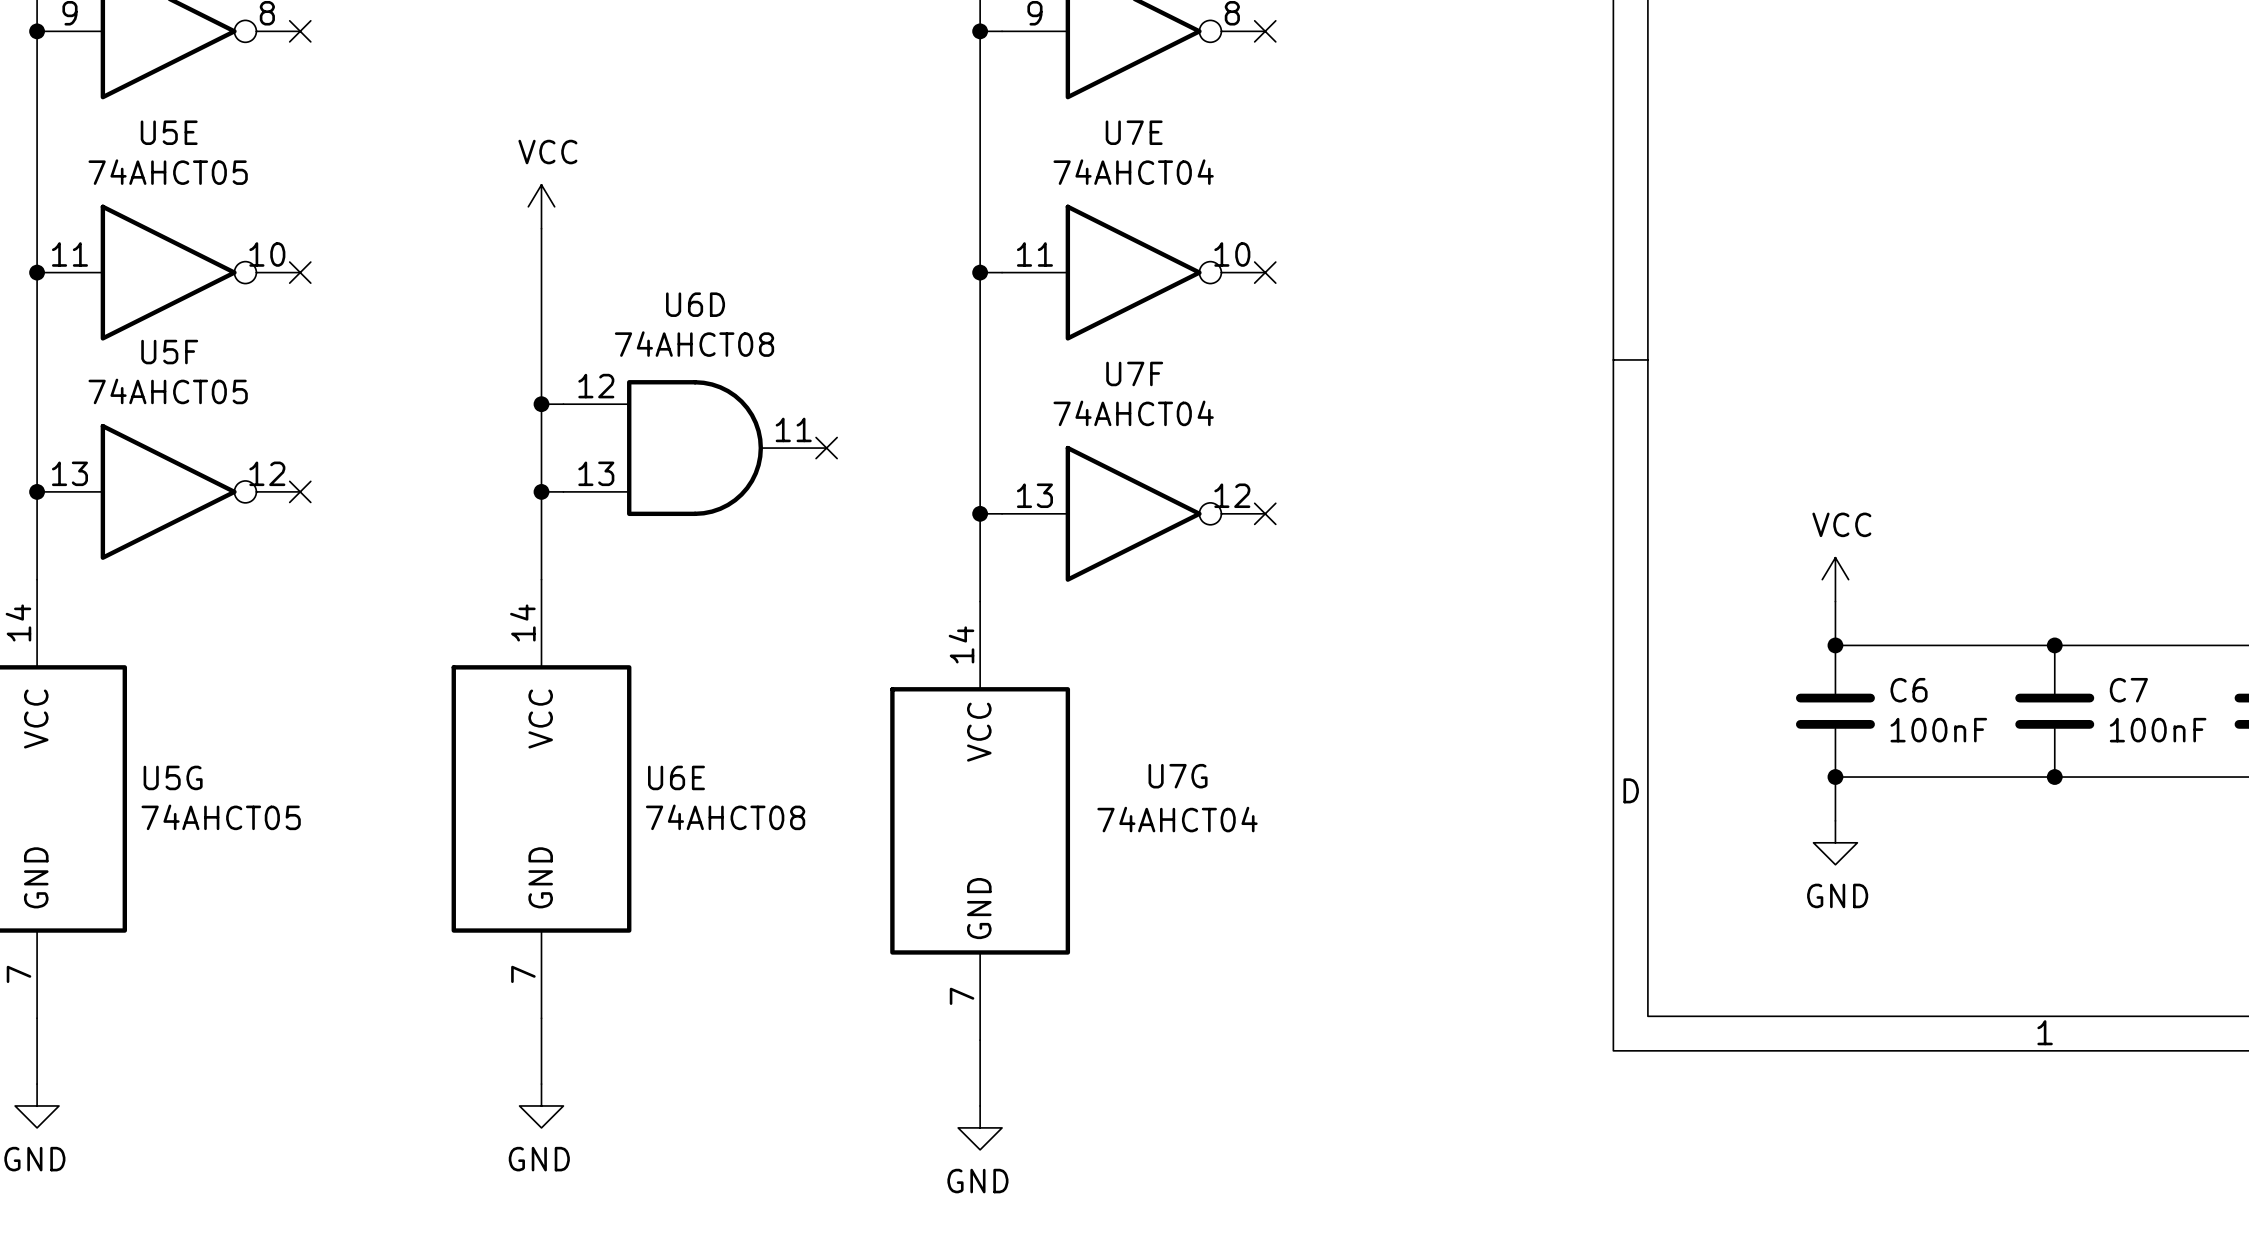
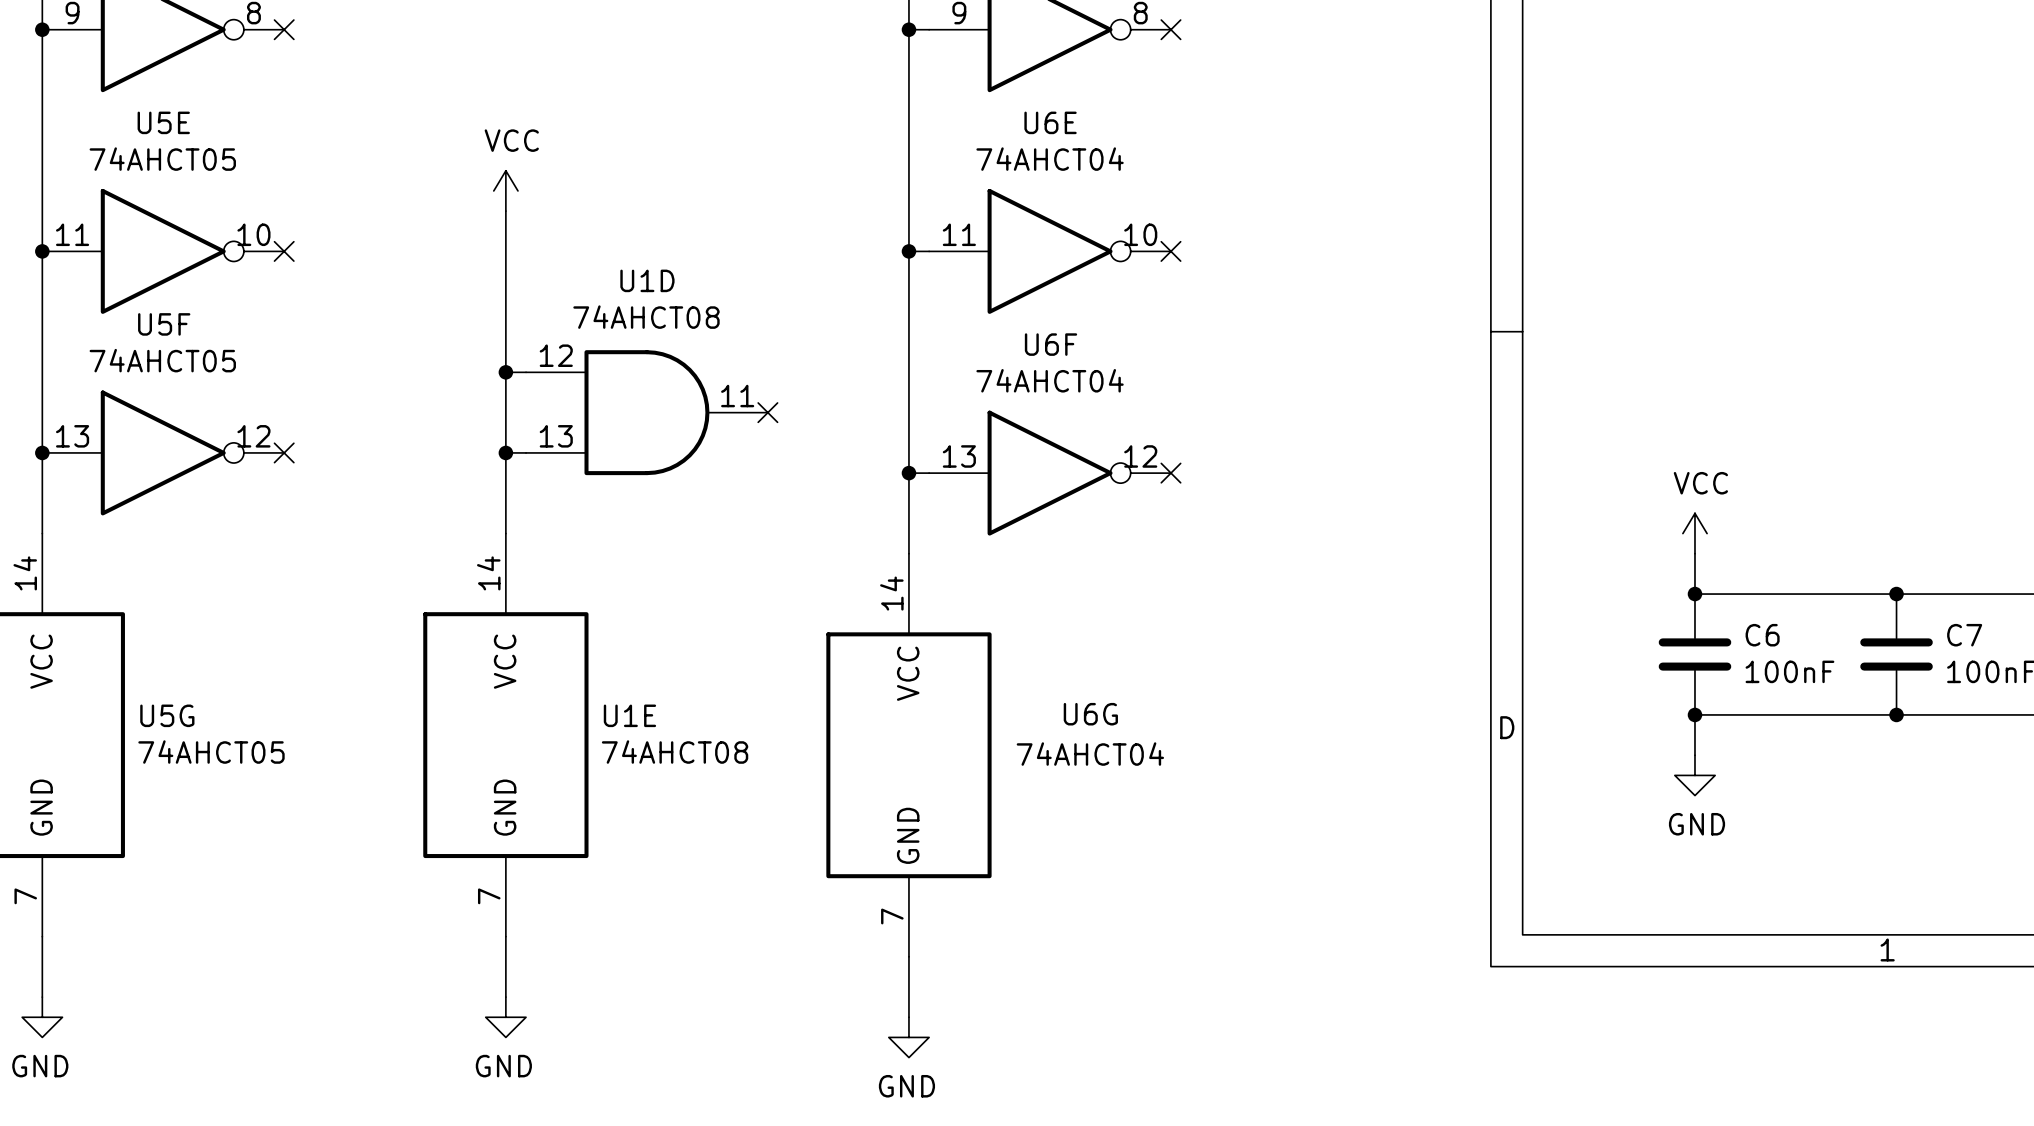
U7E name: U7E (1134, 132) -> U6E (1050, 122)
U6D name: U6D (695, 304) -> U1D (647, 280)
U7F name: U7F (1134, 373) -> U6F (1051, 344)
U7G name: U7G (1178, 776) -> U6G (1090, 714)
U6E name: U6E (676, 777) -> U1E (629, 715)

